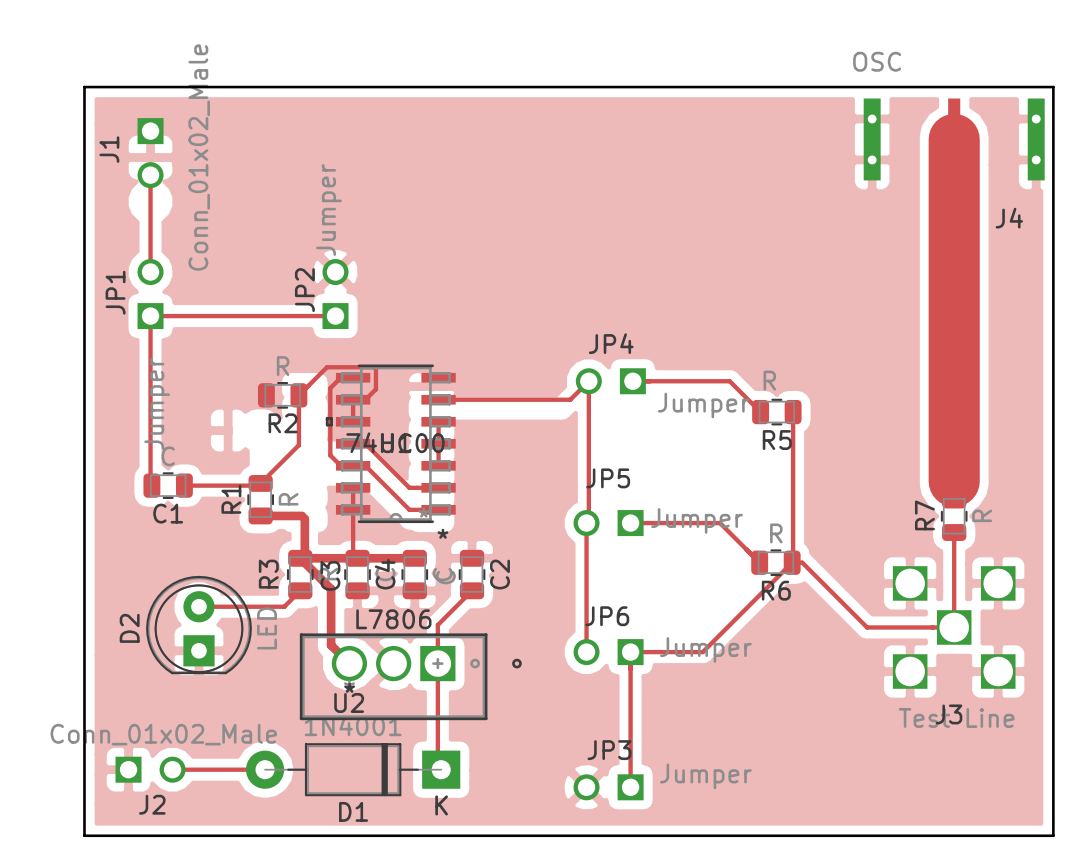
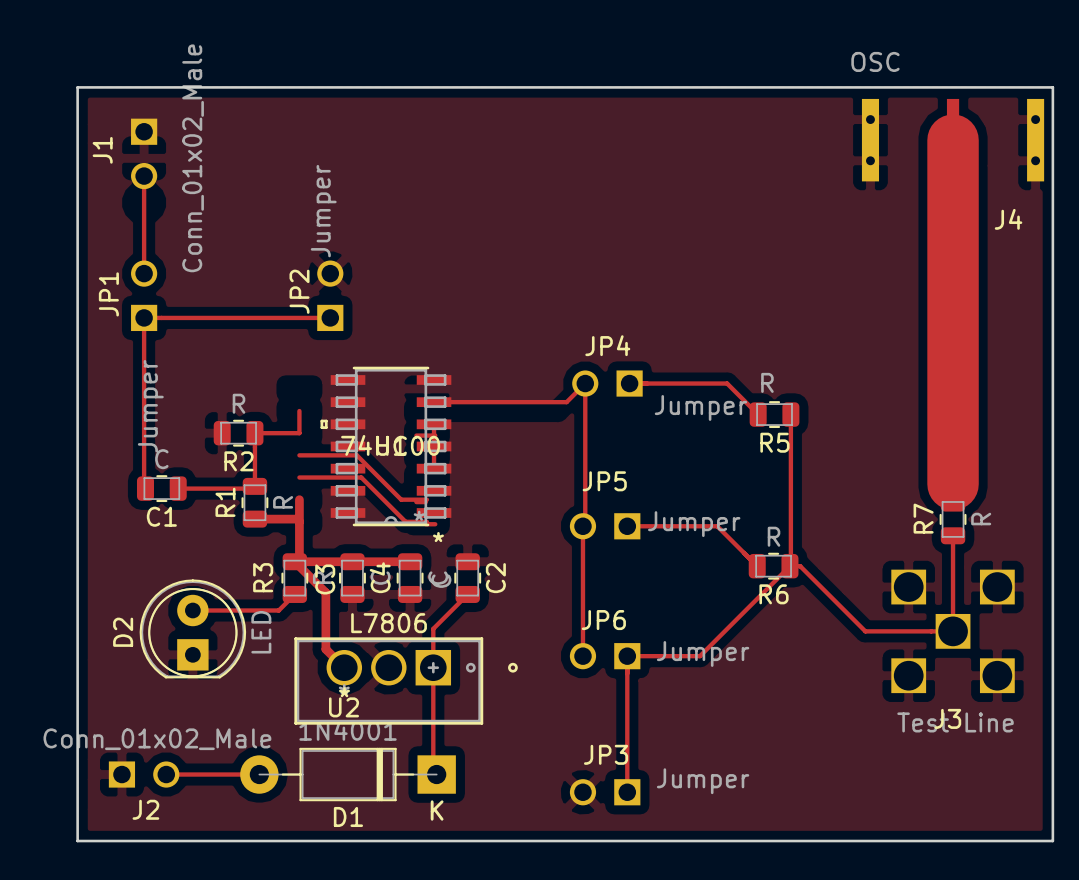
track: (353, 377) (340, 377) (330, 388) (330, 455) (340, 465) (365, 465) (409, 509) (438, 509) -> none
R2 position: (282, 395) -> (238, 433)
track: (353, 421) (353, 399) (365, 399) (375, 389) (375, 368) (327, 367) (298, 395) (298, 445) (260, 483) -> (299, 411) (299, 433) (254, 433) (254, 486)
track: none -> (416, 435) (435, 435)
track: (353, 443) (365, 443) (409, 487) (438, 487) -> none
track: none -> (299, 455) (356, 455) (401, 499) (426, 499)
track: none -> (299, 477) (361, 477) (405, 521) (426, 521)
track: (353, 487) (353, 553) (357, 558) -> none
track: none -> (299, 499) (299, 521)
track: none -> (416, 502) (425, 502)
track: none -> (425, 524) (435, 524)

